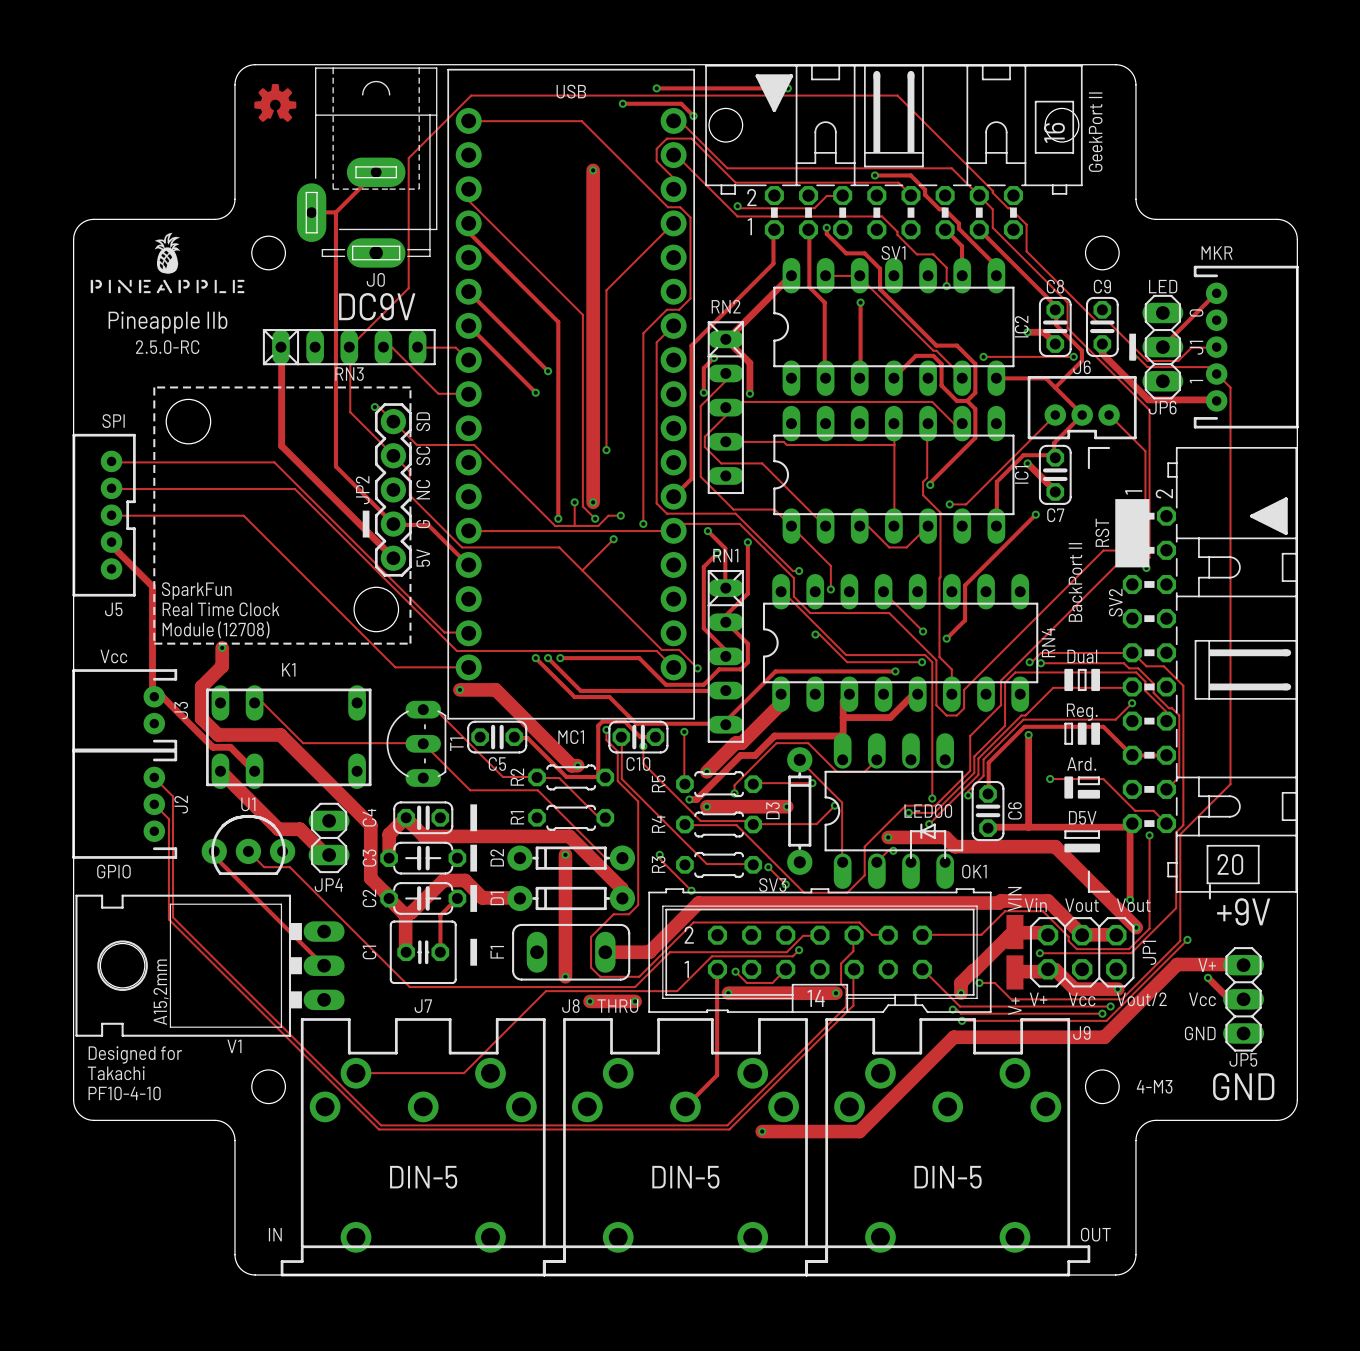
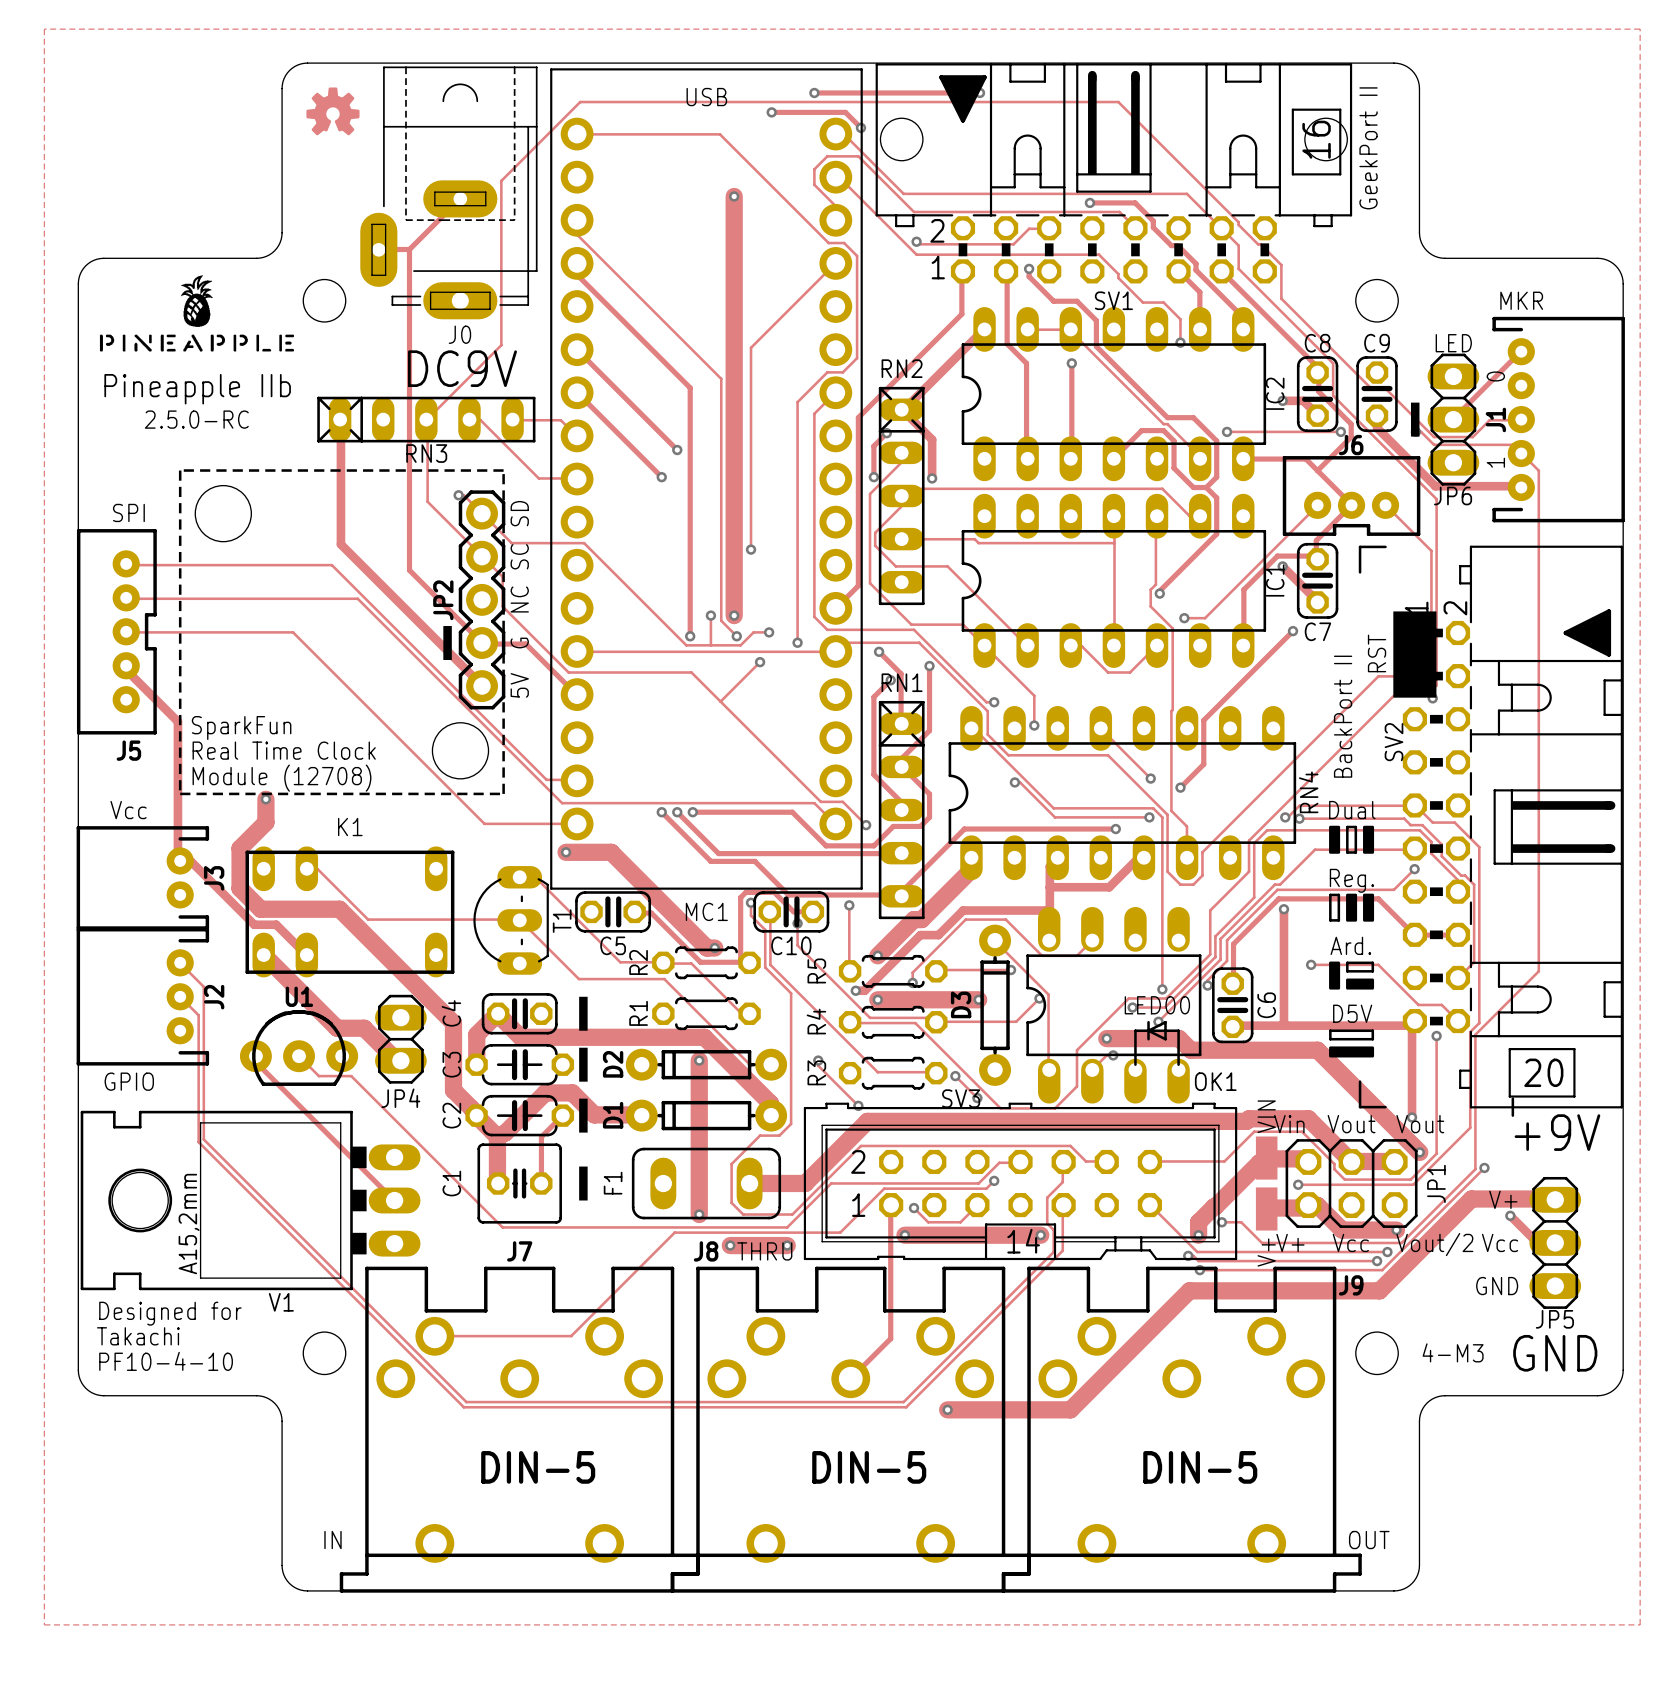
zone outline: none -> (44, 29) (1640, 29) (1640, 1624) (44, 1624) (44, 29)

